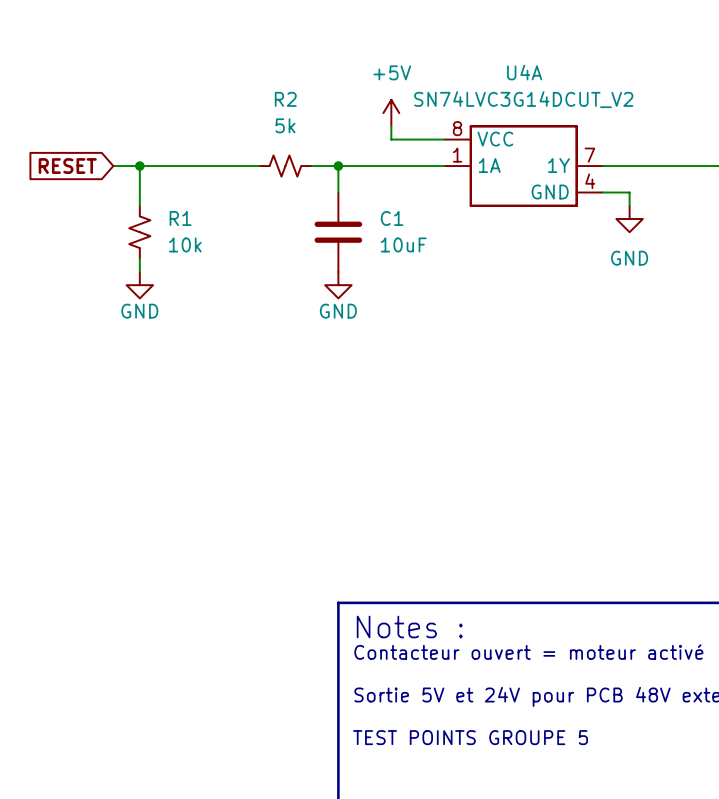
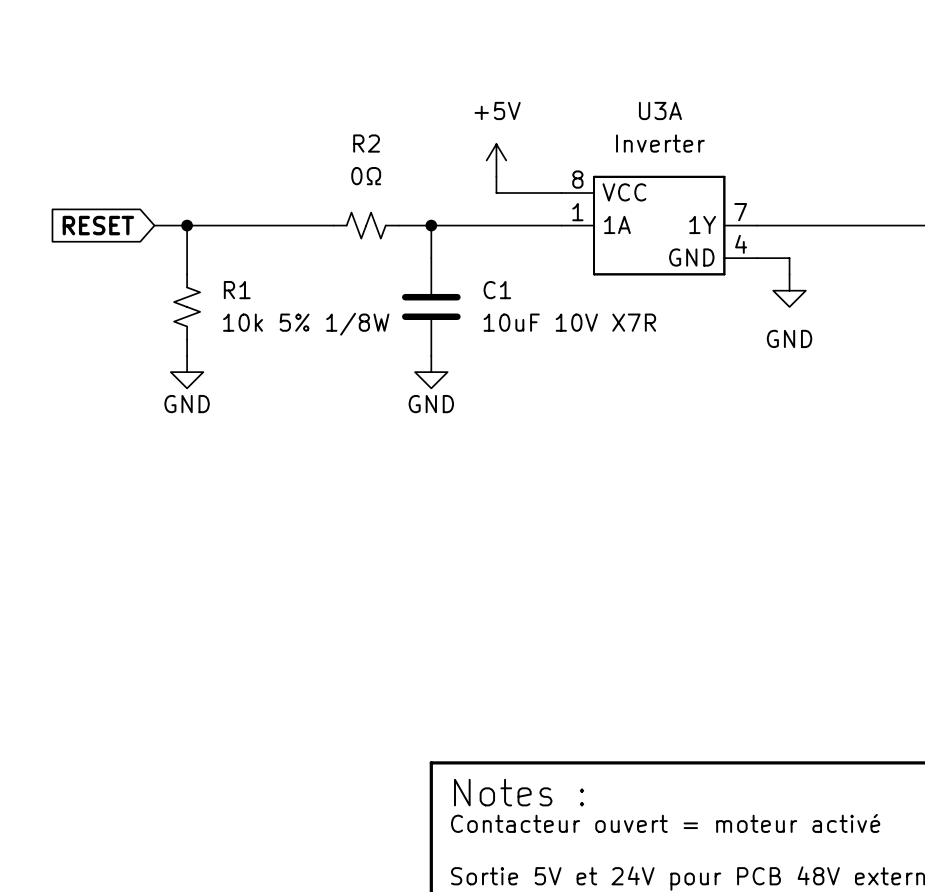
U4A name: U4A (524, 72) -> U3A (660, 110)
U4A value: SN74LVC3G14DCUT_V2 (523, 99) -> Inverter (660, 143)
R2 value: 5k (285, 125) -> 0Ω (366, 176)
R1 value: 10k (185, 244) -> 10k 5% 1/8W (306, 324)
C1 value: 10uF (403, 244) -> 10uF 10V X7R (569, 322)

